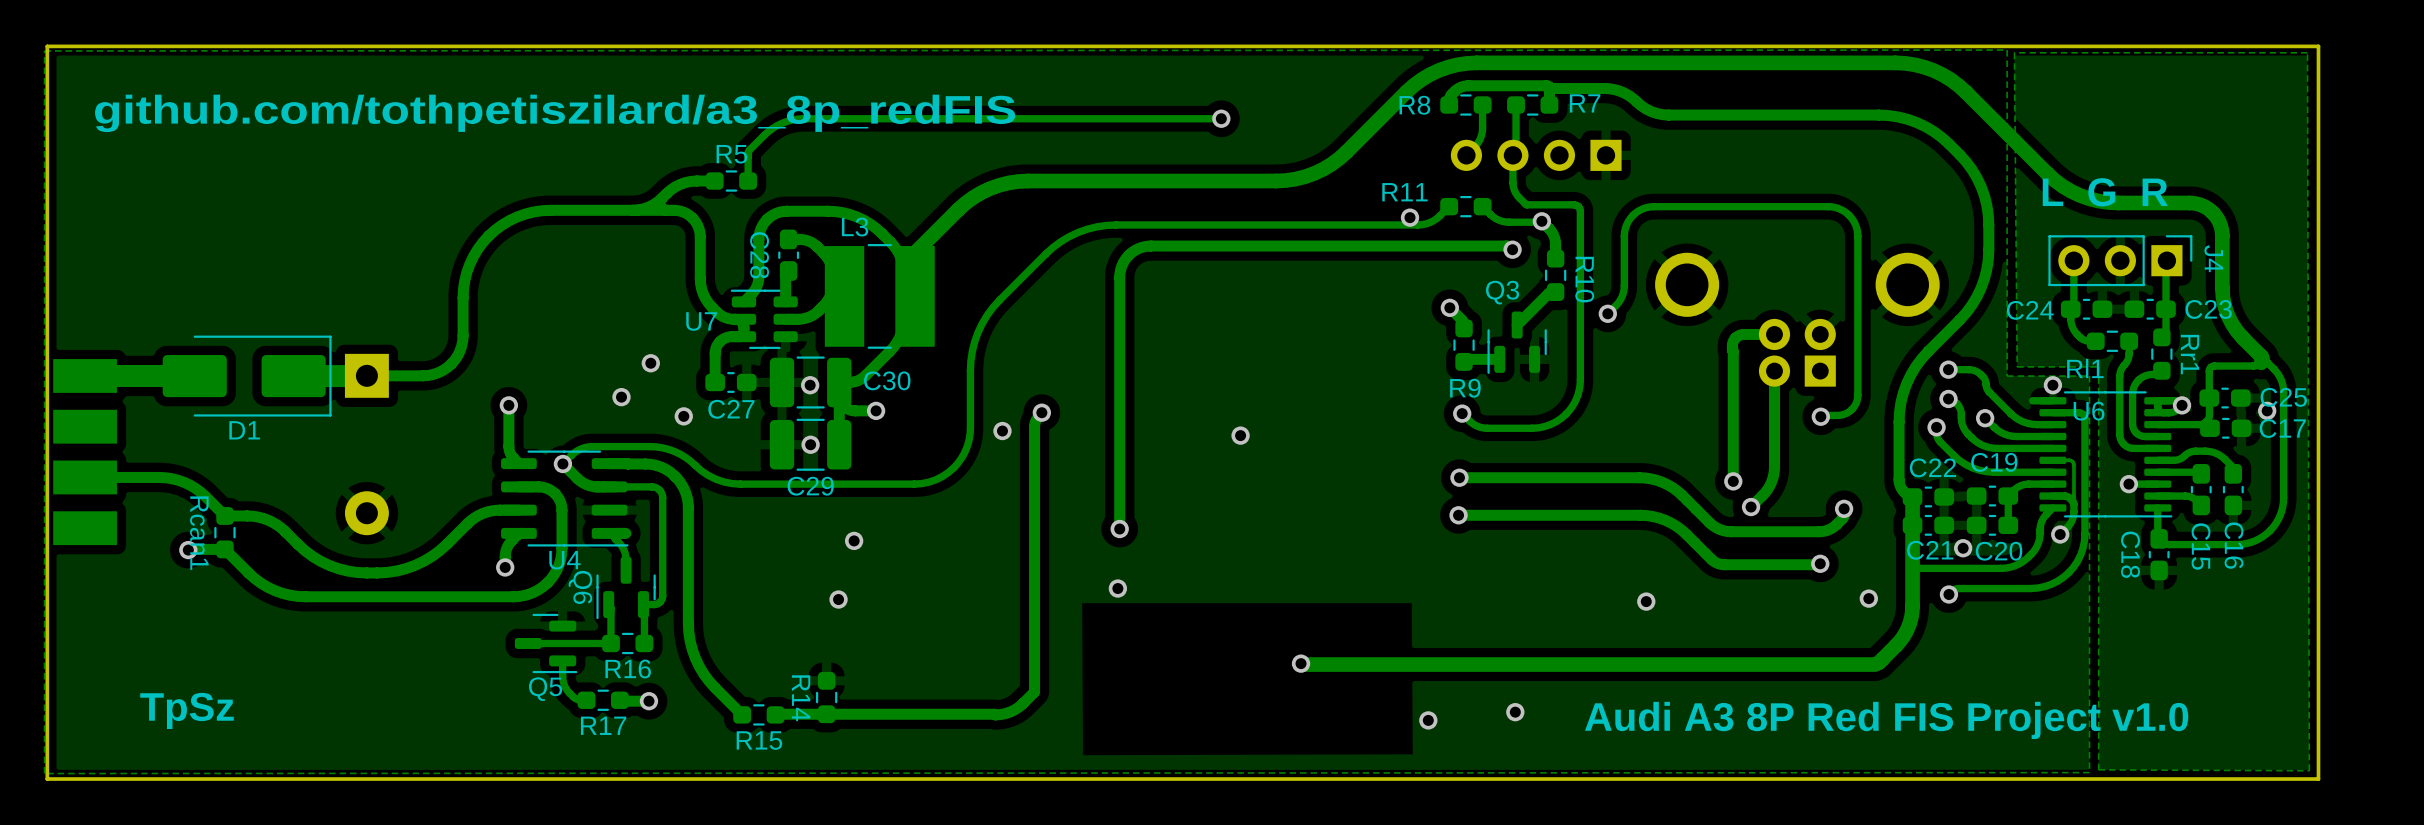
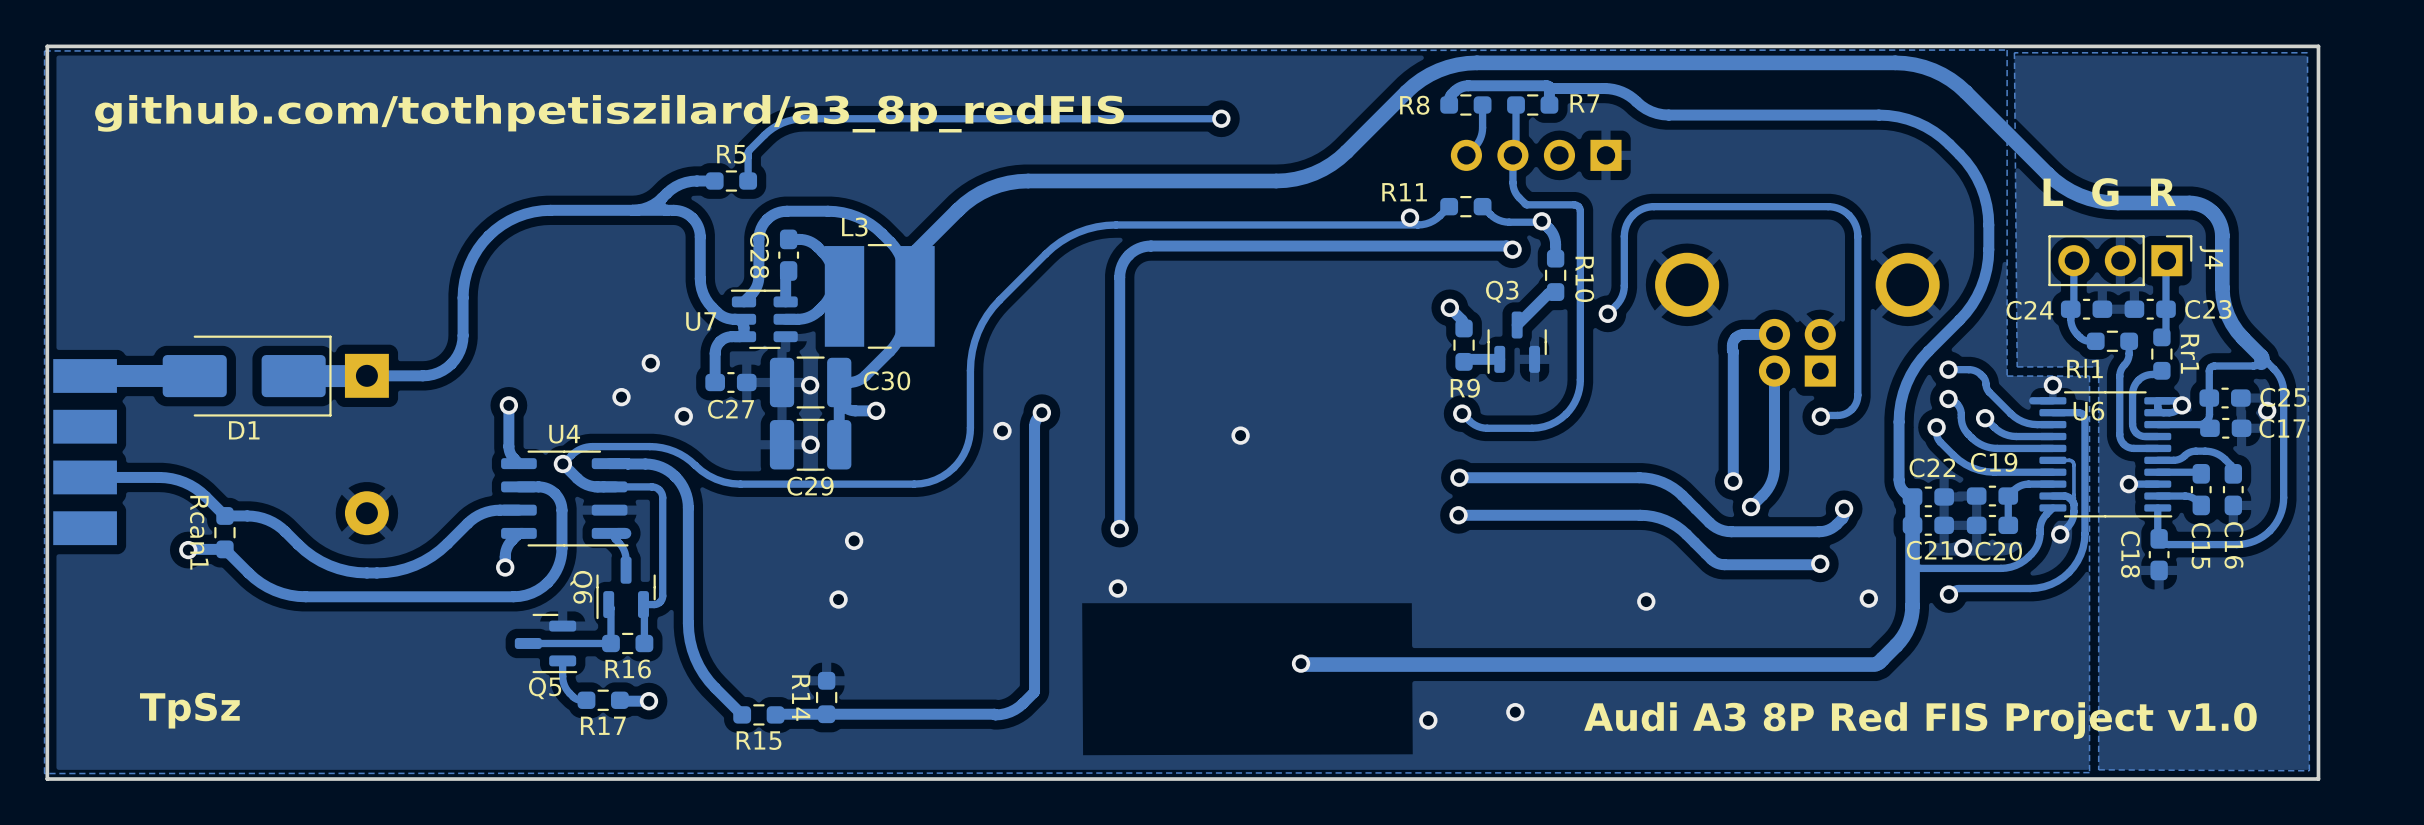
U4 name position: U4 (564, 560) -> U4 (564, 434)

